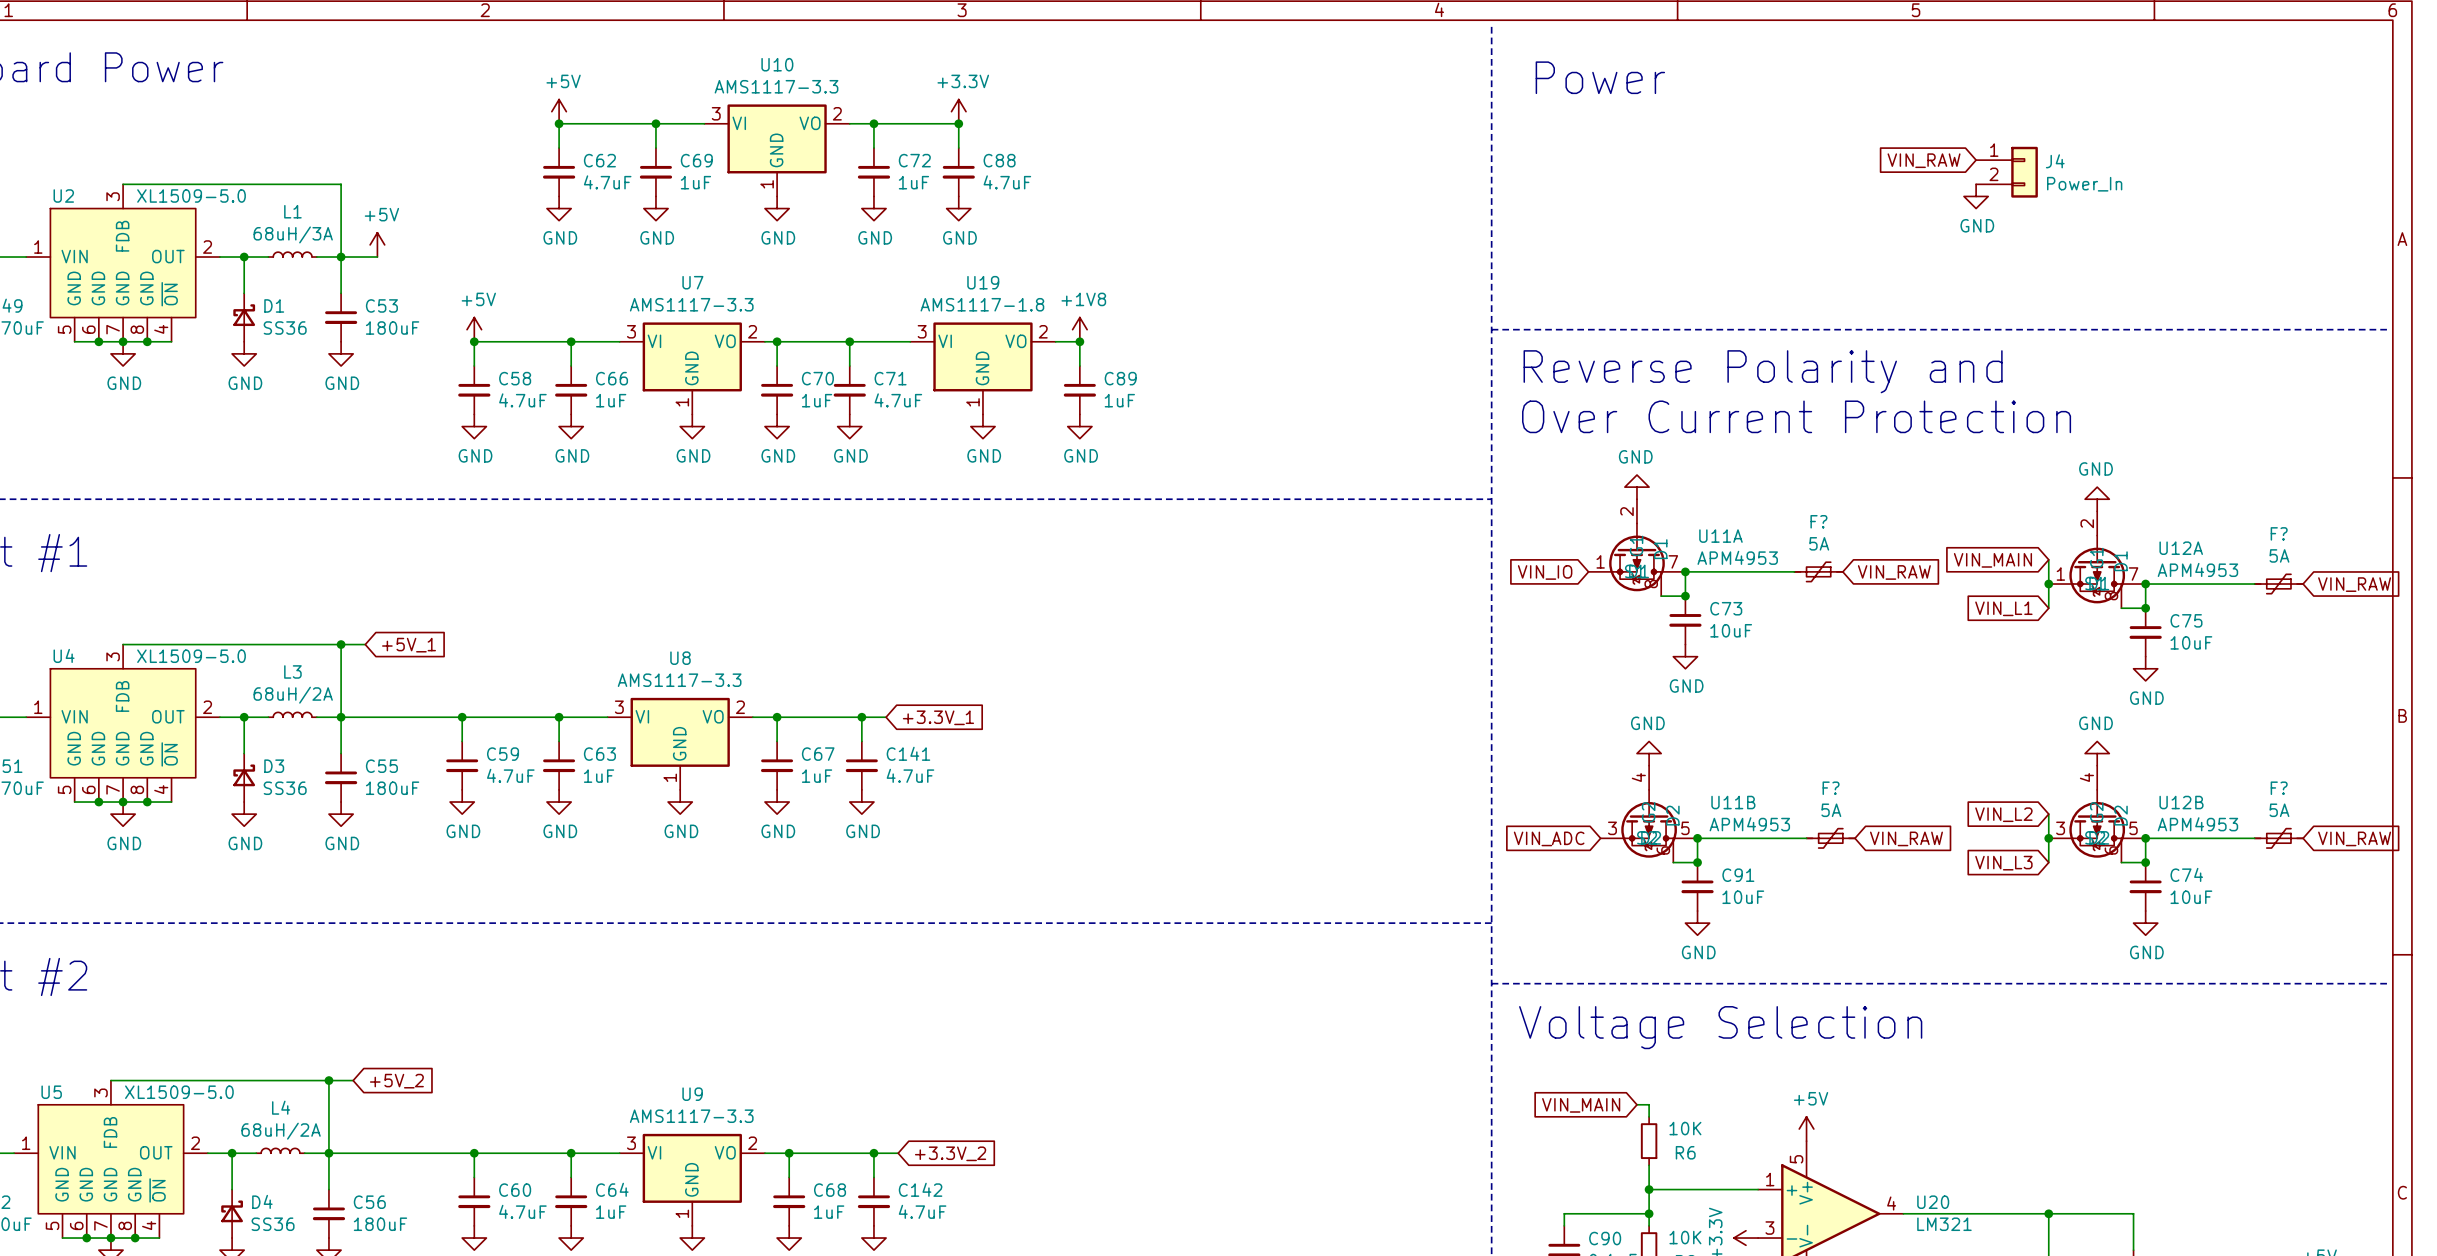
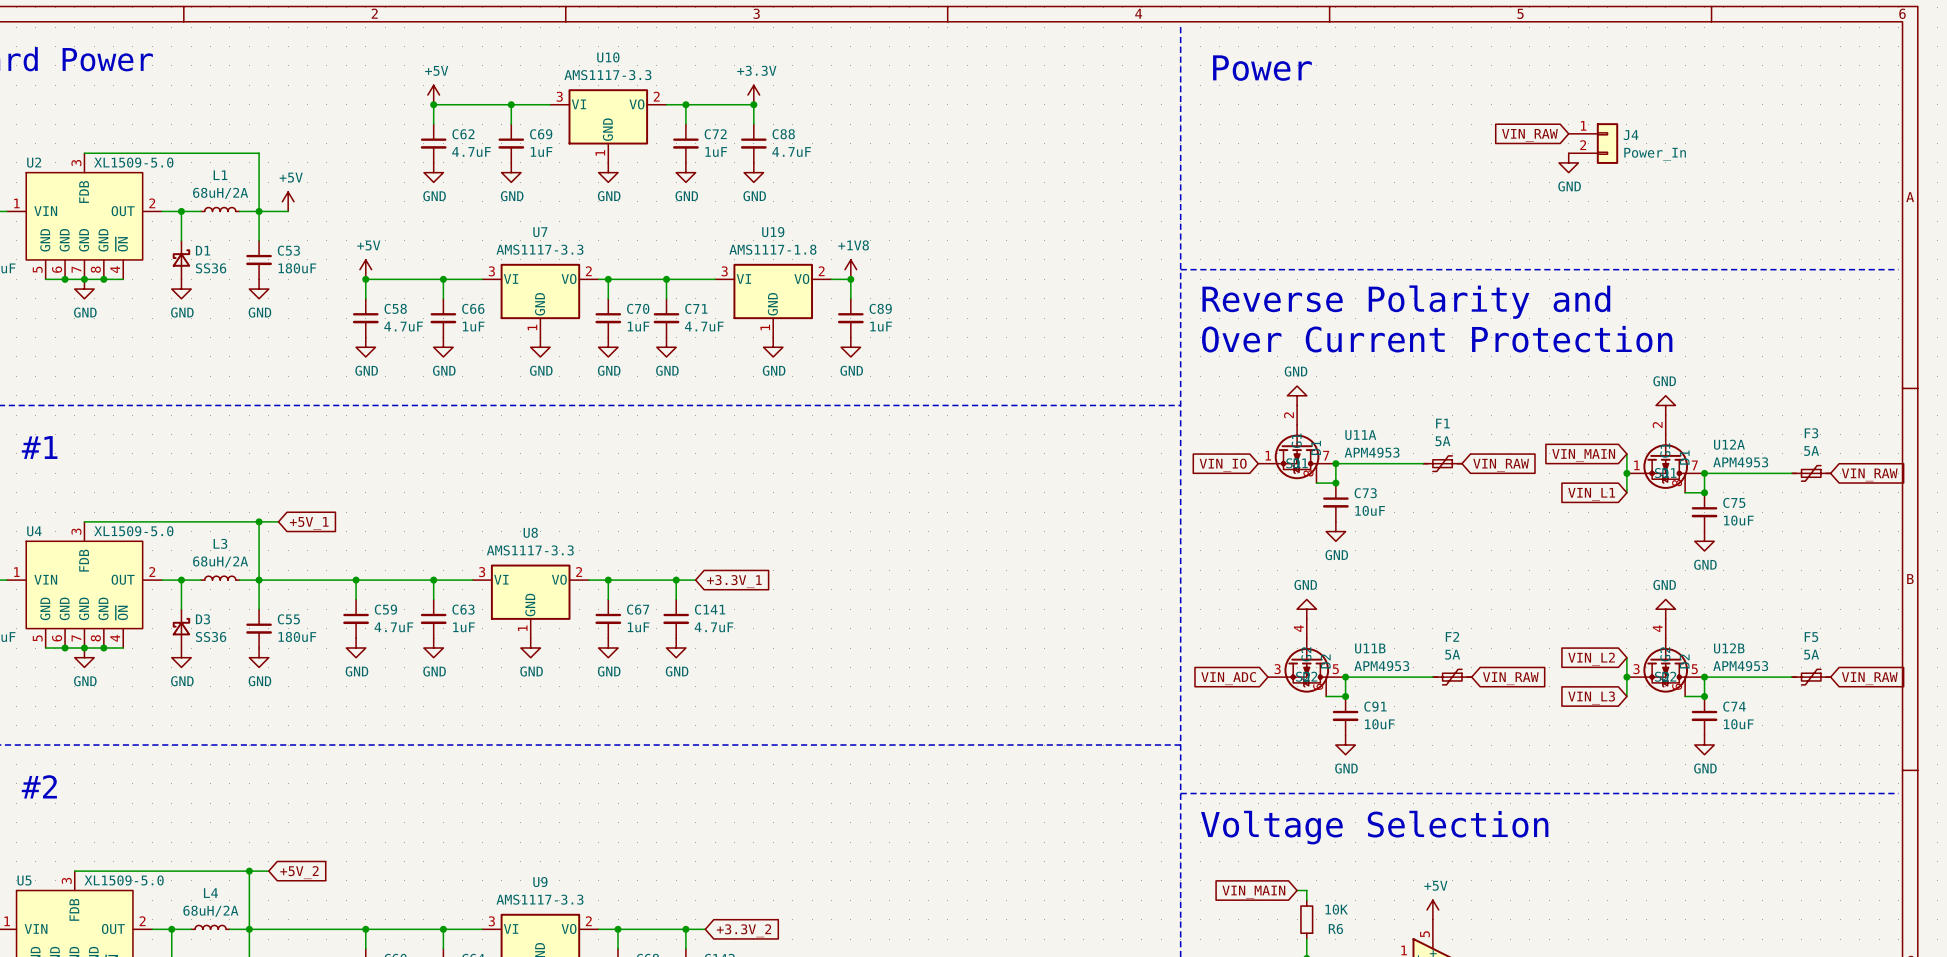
L1 value: 68uH/3A (293, 234) -> 68uH/2A (220, 193)
F? name: F? (1818, 521) -> F1 (1442, 423)
F? name: F? (2279, 533) -> F3 (1811, 433)
F? name: F? (1831, 788) -> F2 (1452, 636)
F? name: F? (2279, 788) -> F5 (1811, 637)

